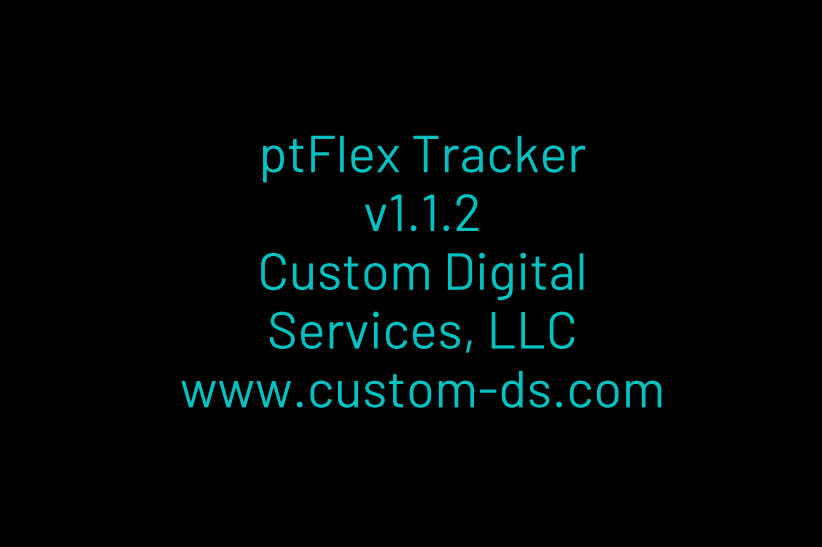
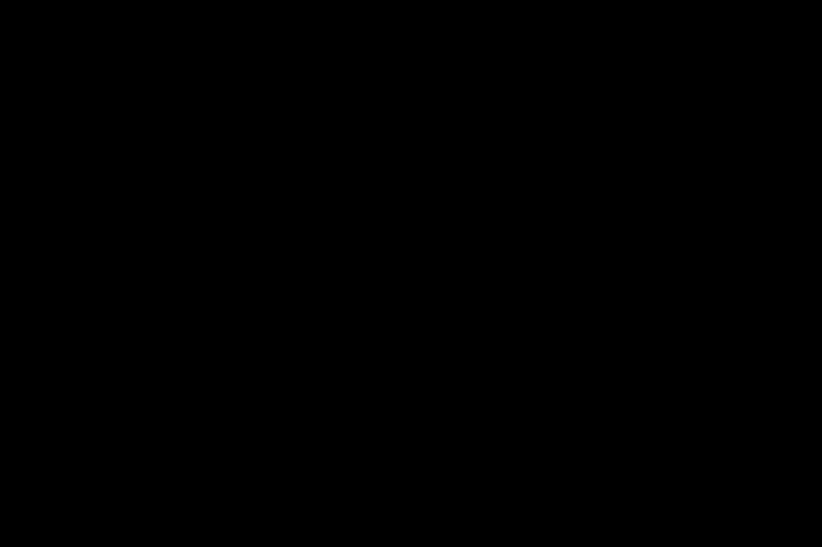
text: ptFlex Tracker (424, 159) -> none
text: v1.1.2 (421, 212) -> none
text: Custom Digital (422, 276) -> none
text: Services, LLC (422, 332) -> none
text: www.custom-ds.com (421, 389) -> none

